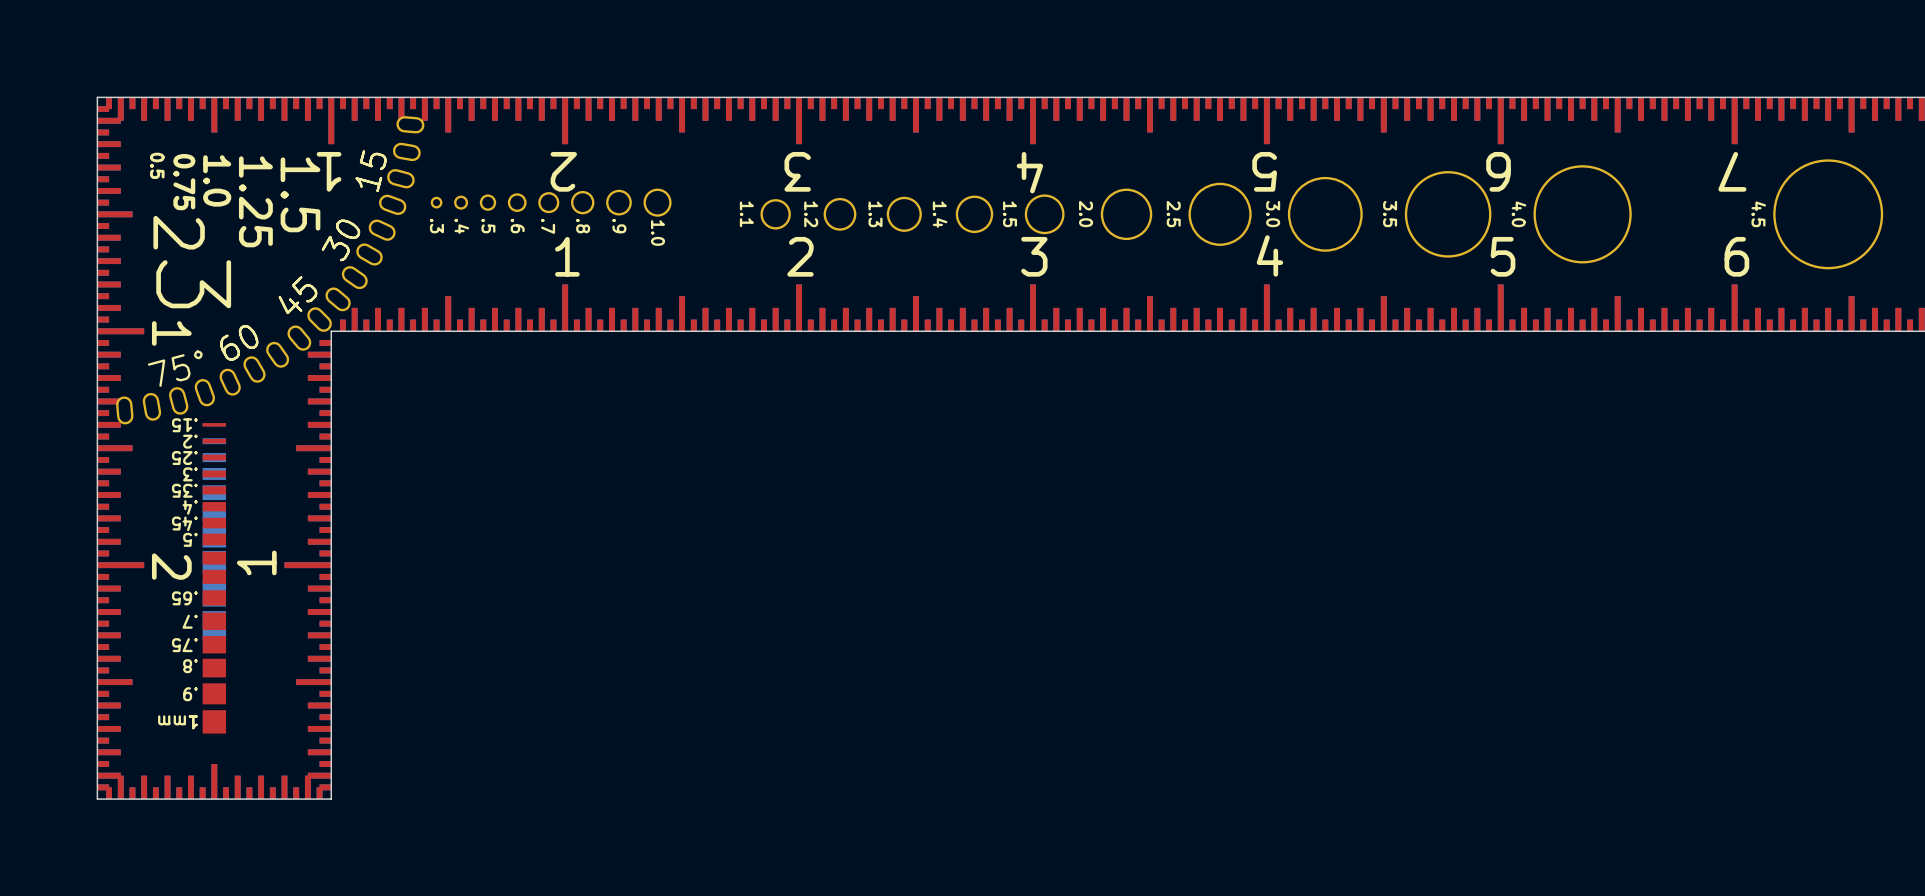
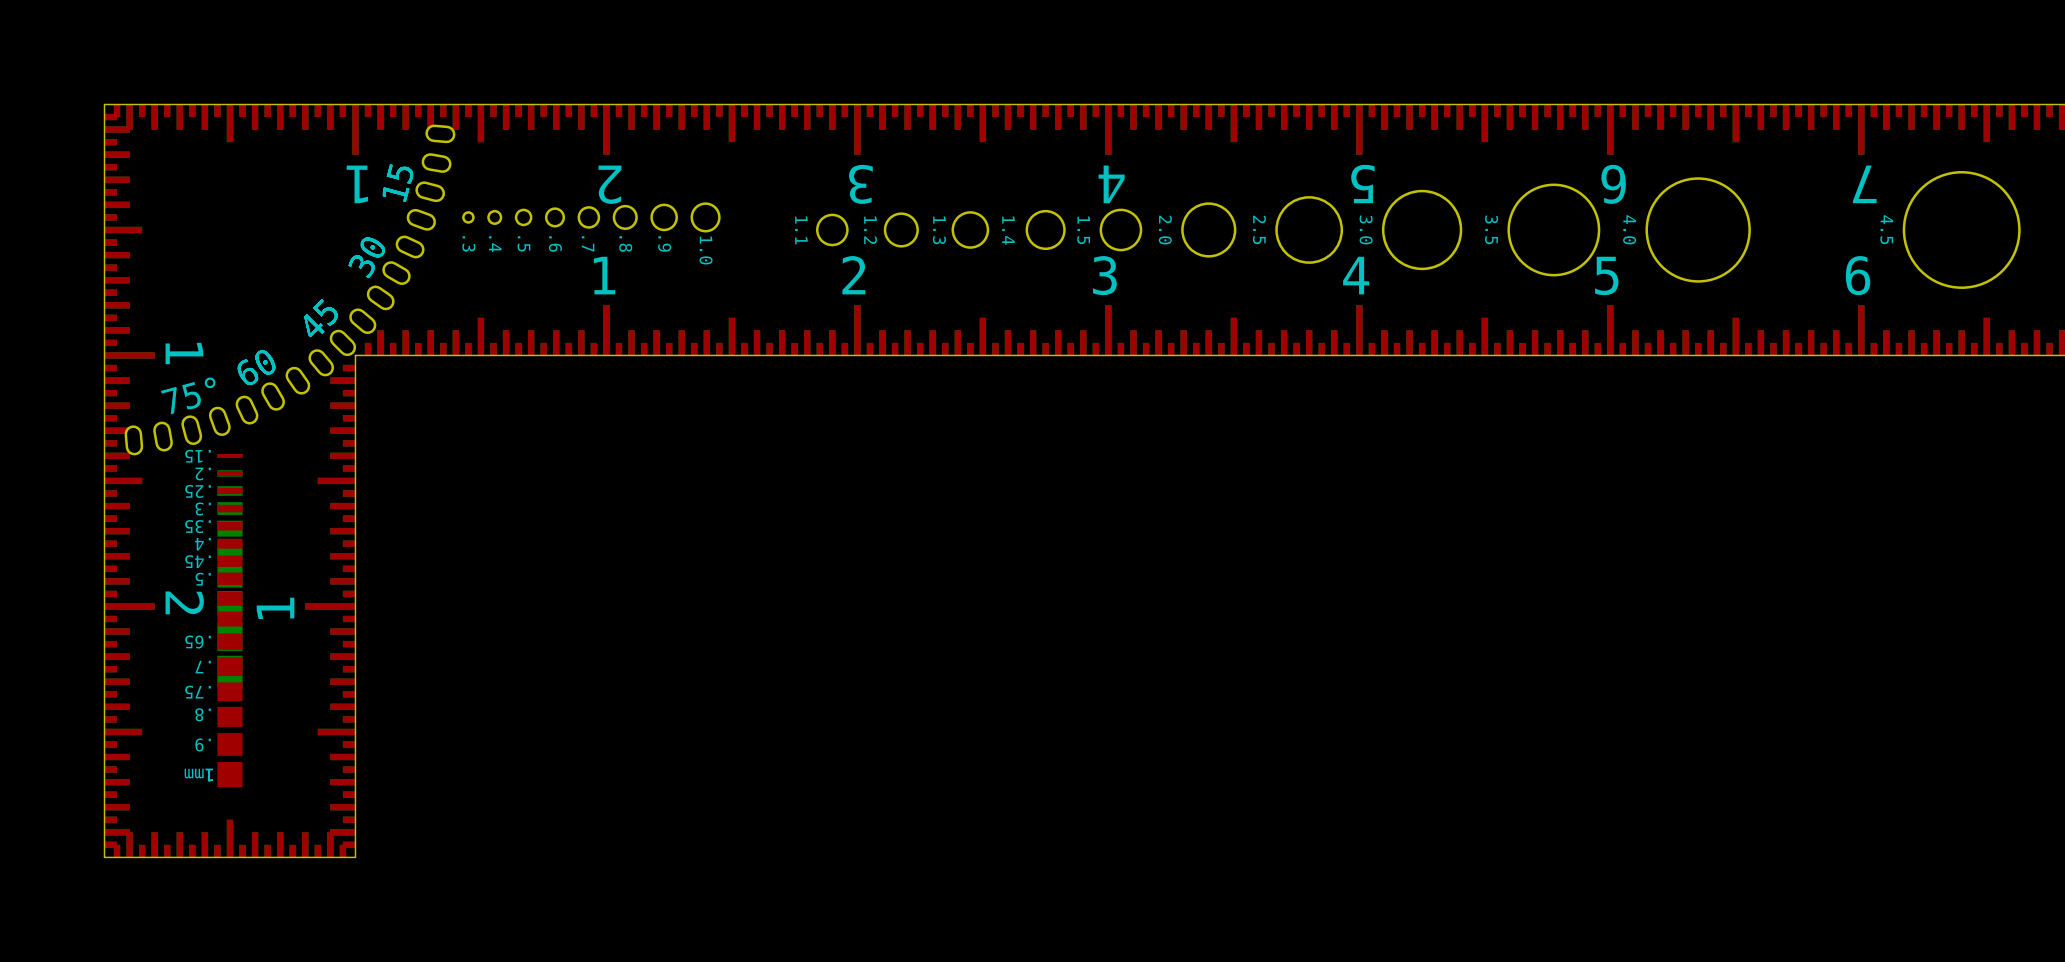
text: 0.5 (157, 165) -> none
text: 1.0 (217, 180) -> none
text: 0.75 (184, 182) -> none
text: 1.5 (300, 194) -> none
text: 1.25 (255, 201) -> none
text: 2 (179, 232) -> none
text: 3 (193, 284) -> none

